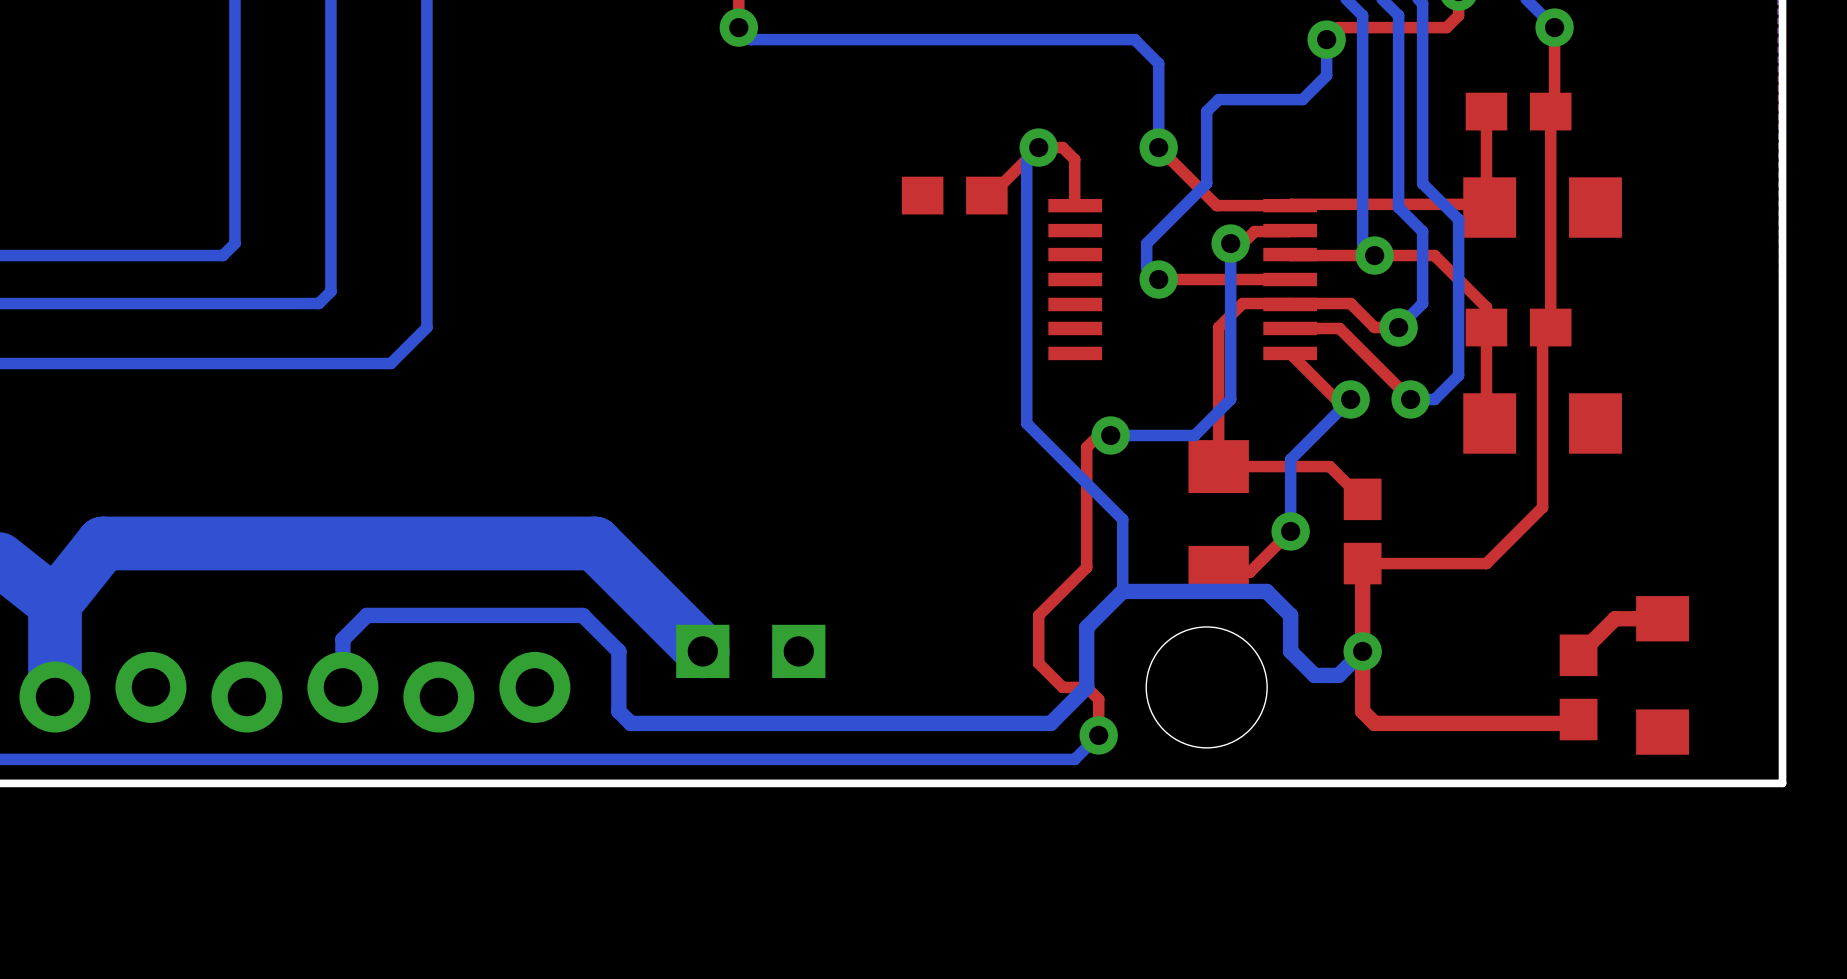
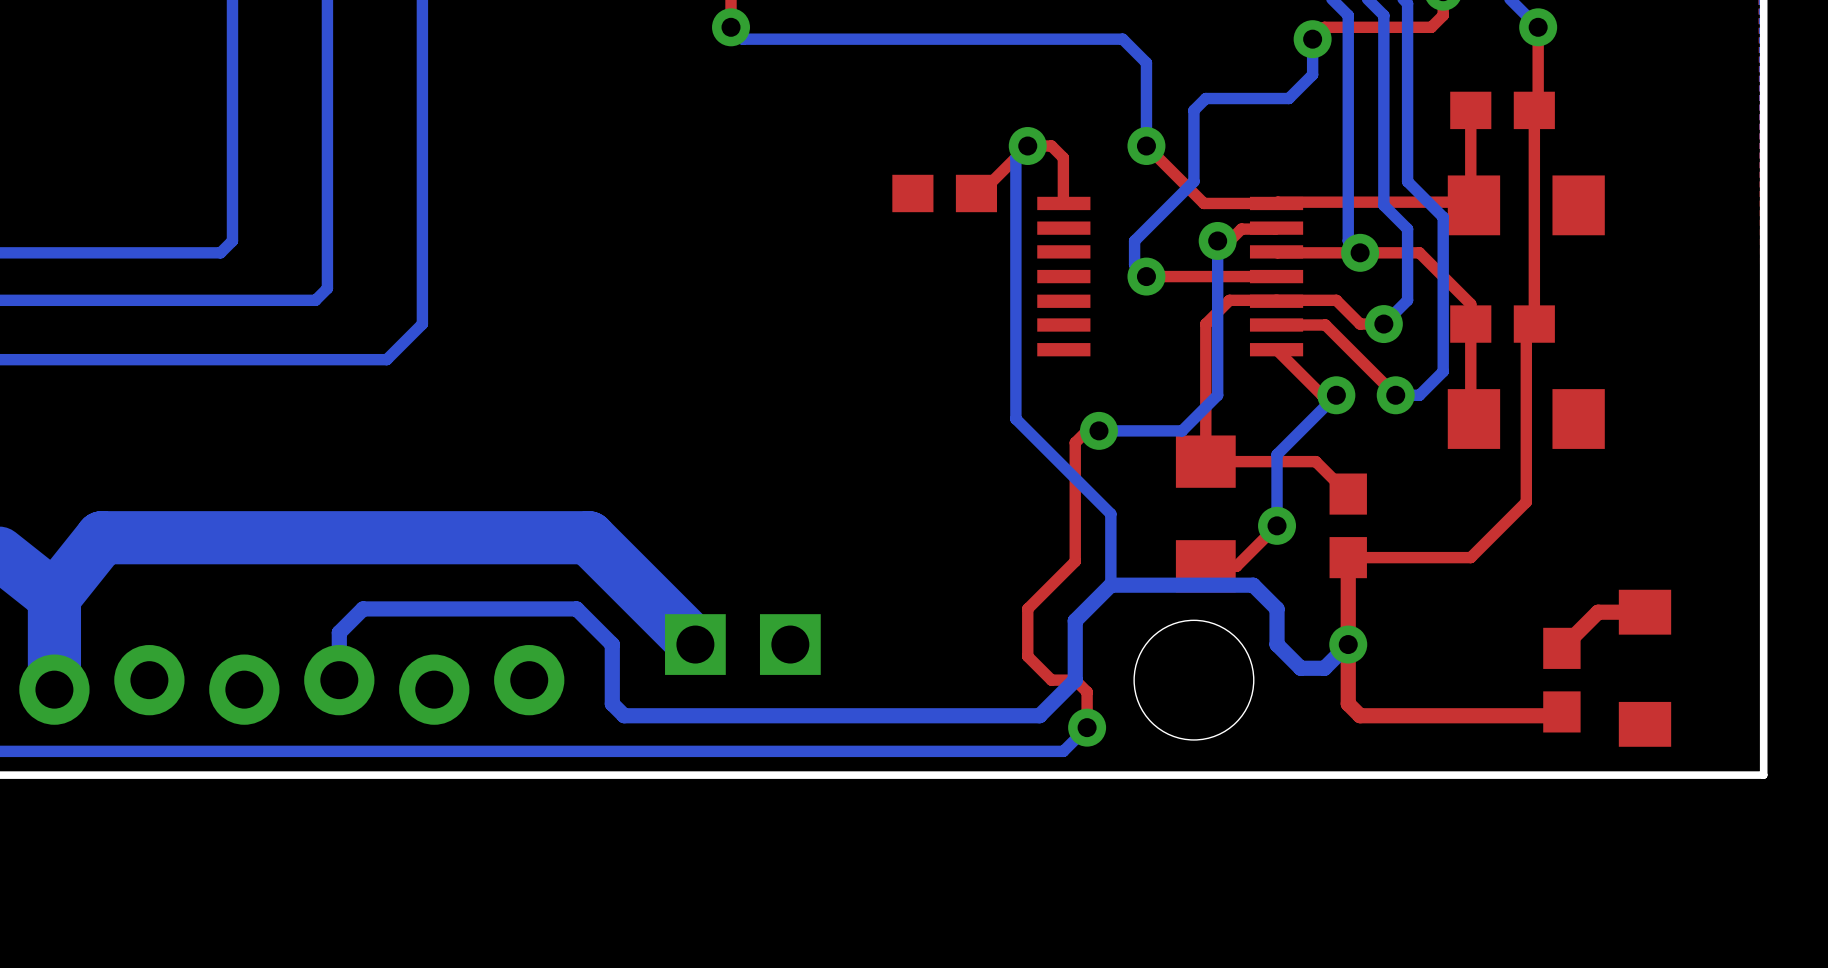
part footprint: [676, 624, 826, 679] -> [665, 614, 821, 675]

